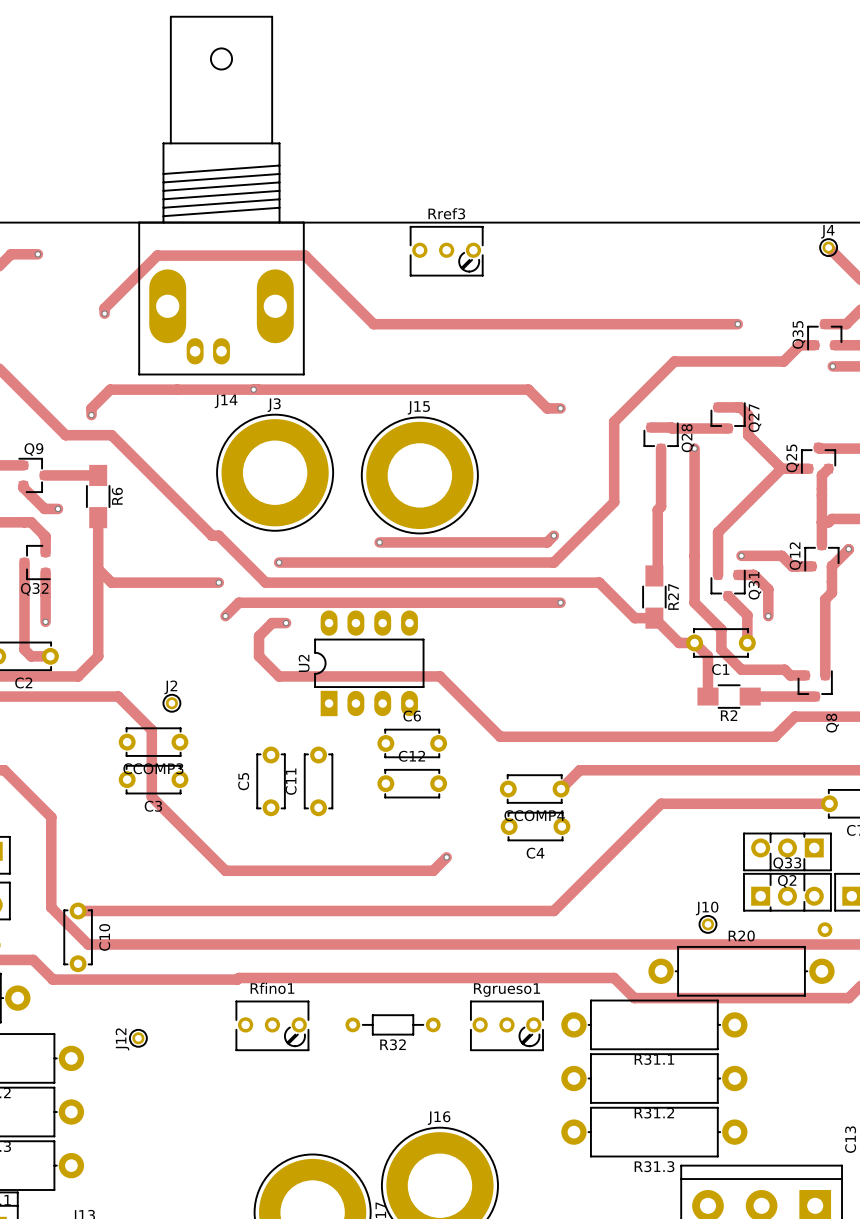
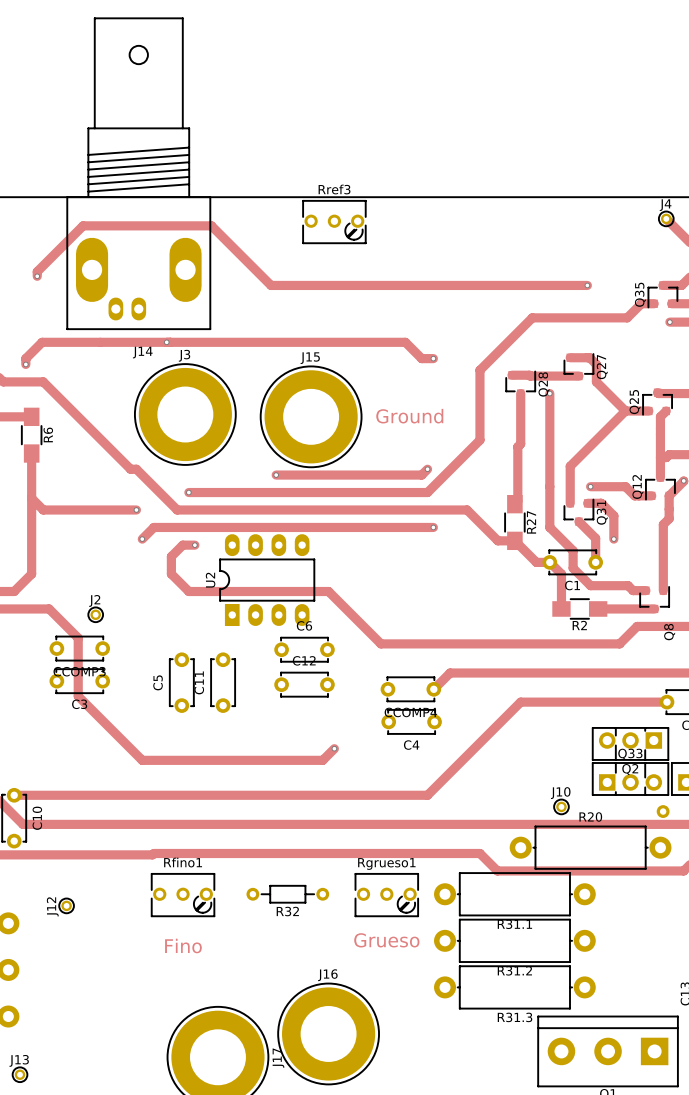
text: none -> Ground (409, 416)
text: none -> Grueso (386, 940)
text: none -> Fino (183, 945)

